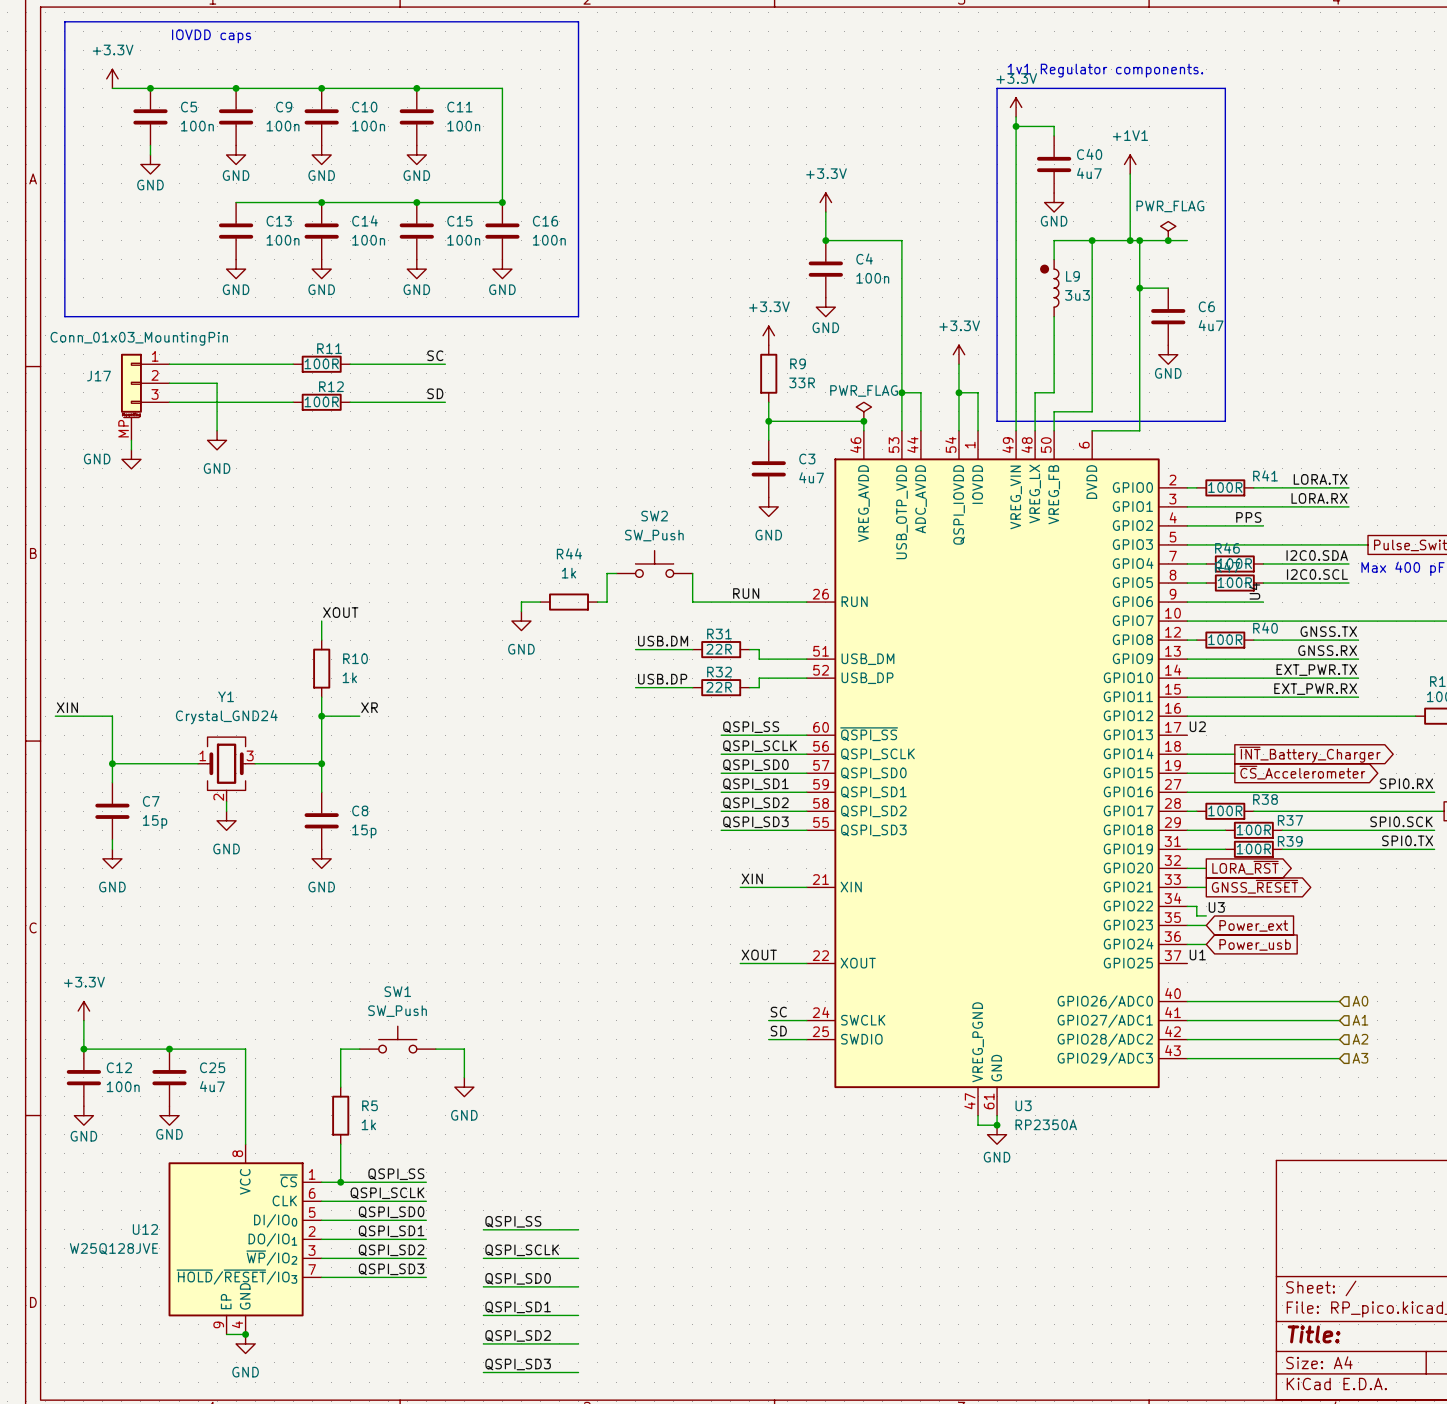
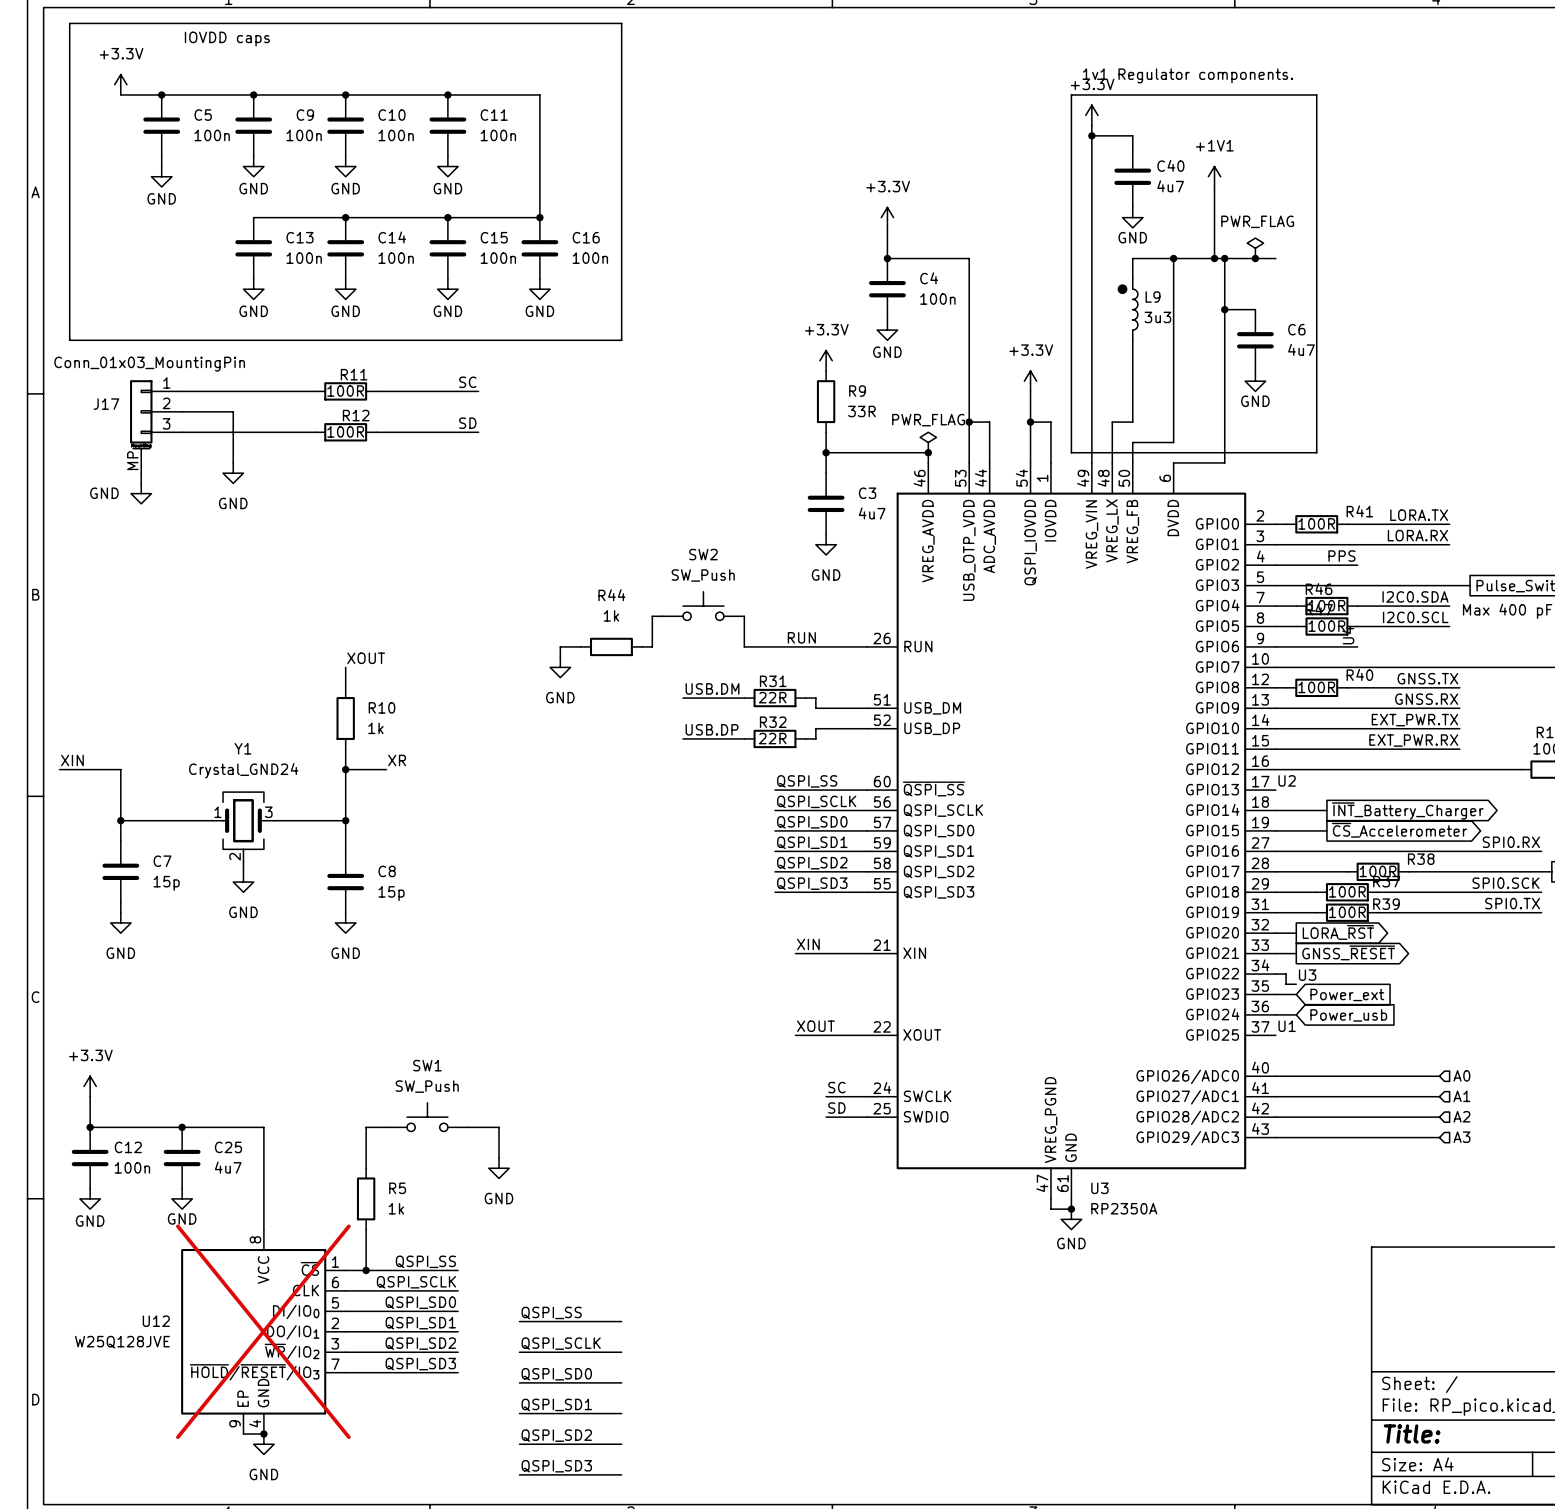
R38 position: (1225, 811) -> (1378, 871)
U12 do-not-place cross: none -> (263, 1331)

